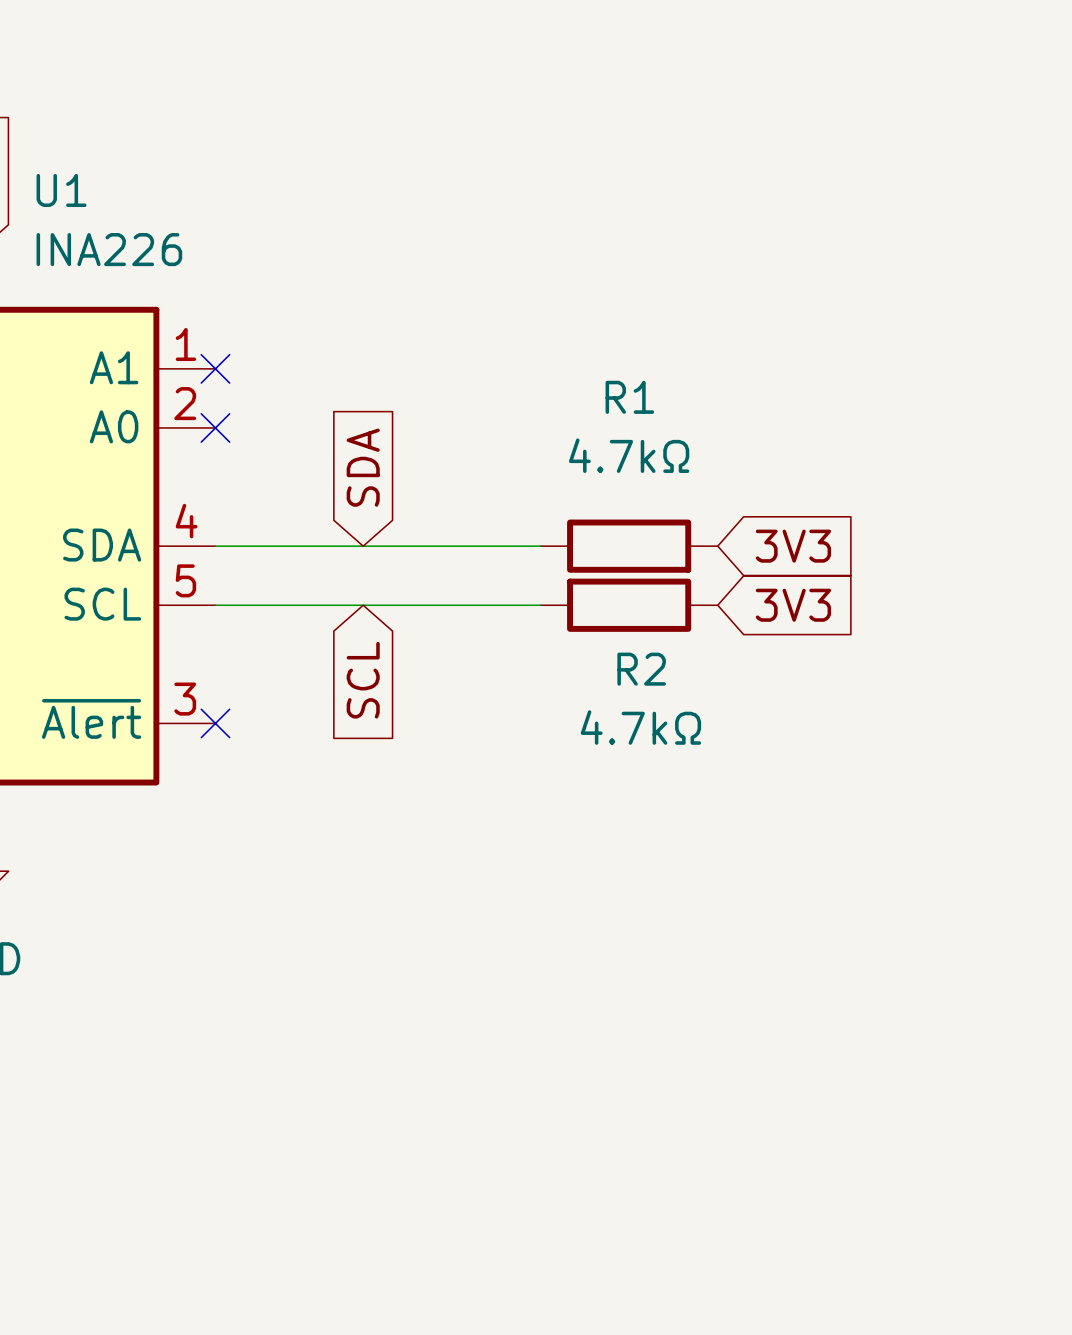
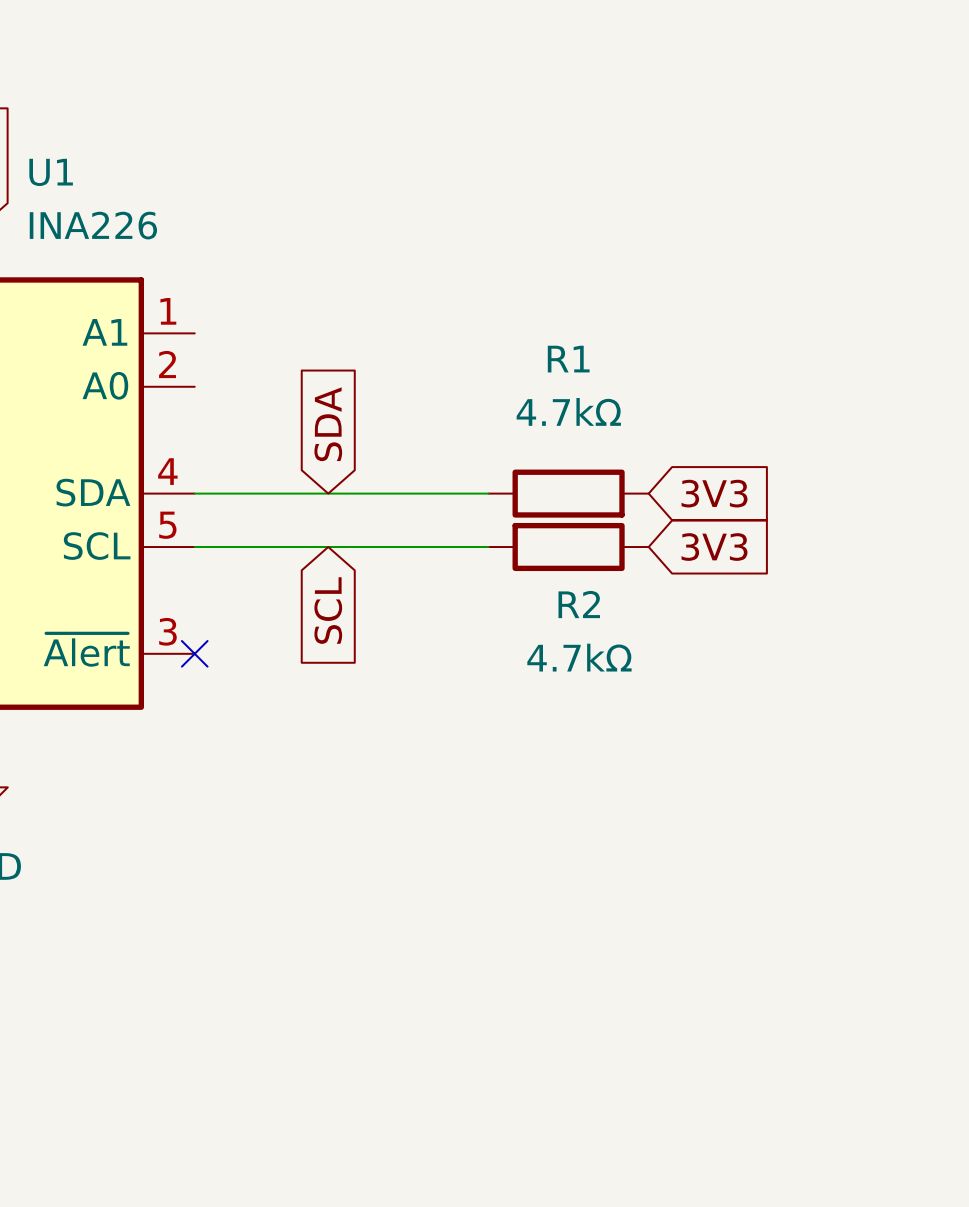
no-connect mark: (215, 368) -> none
no-connect mark: (215, 427) -> none

